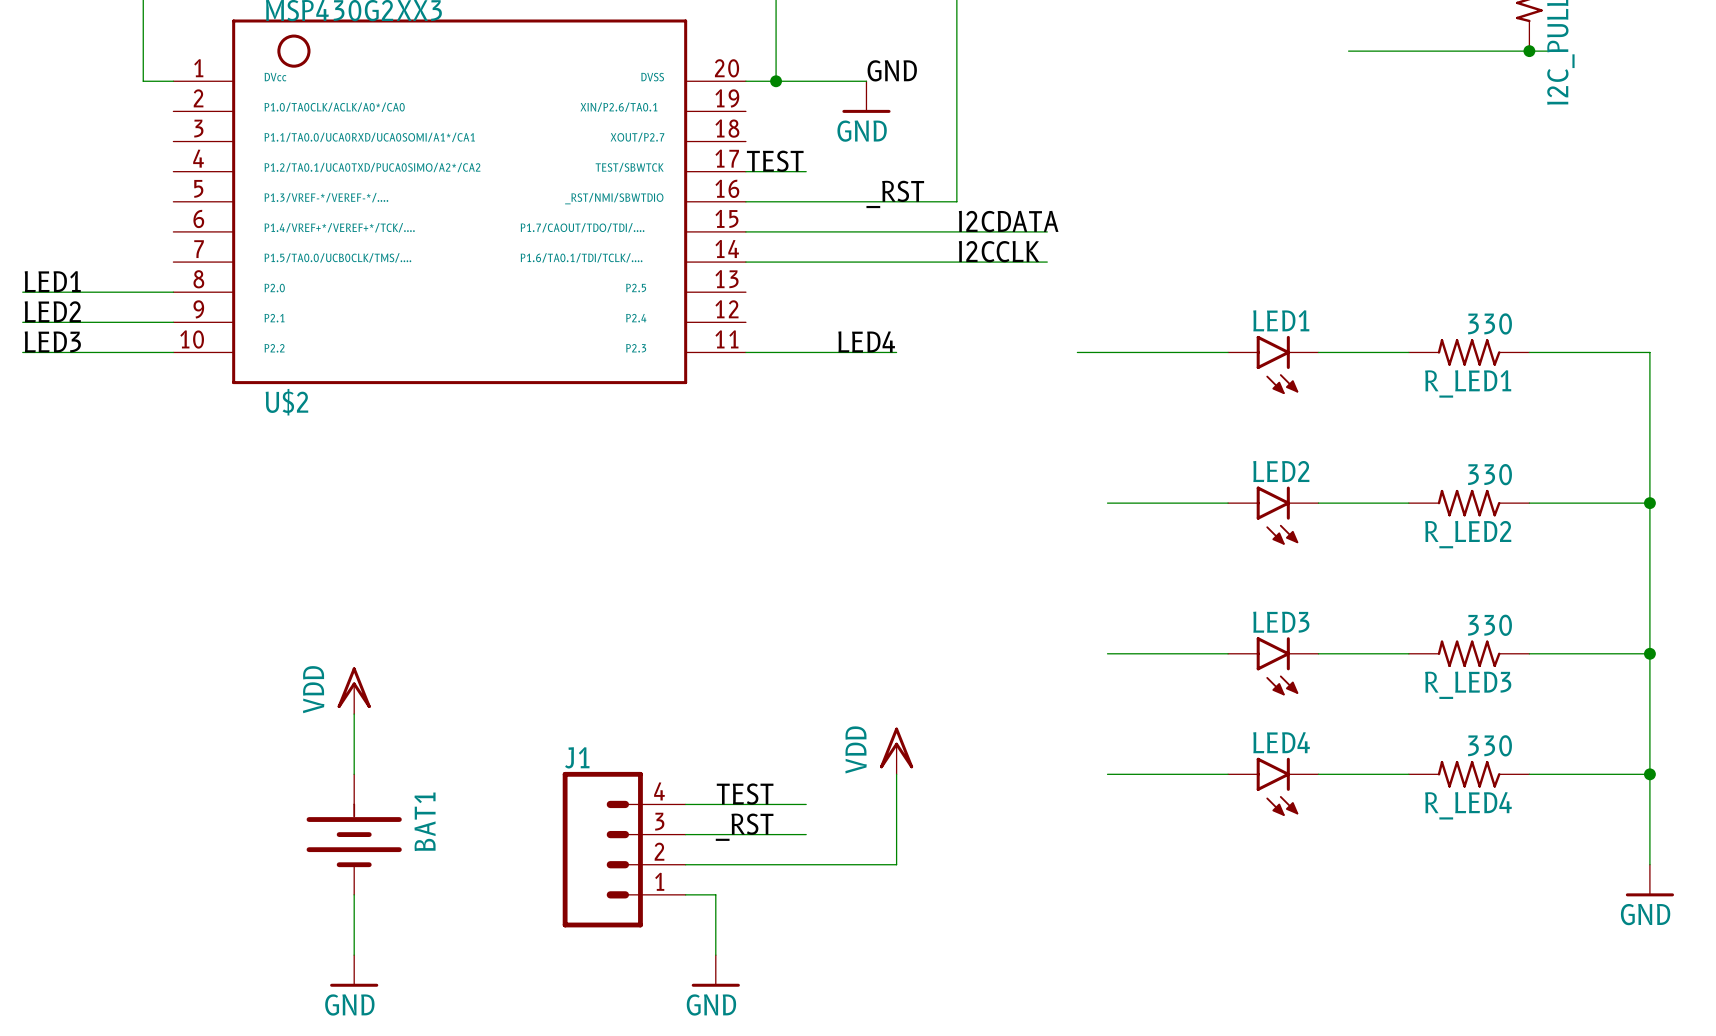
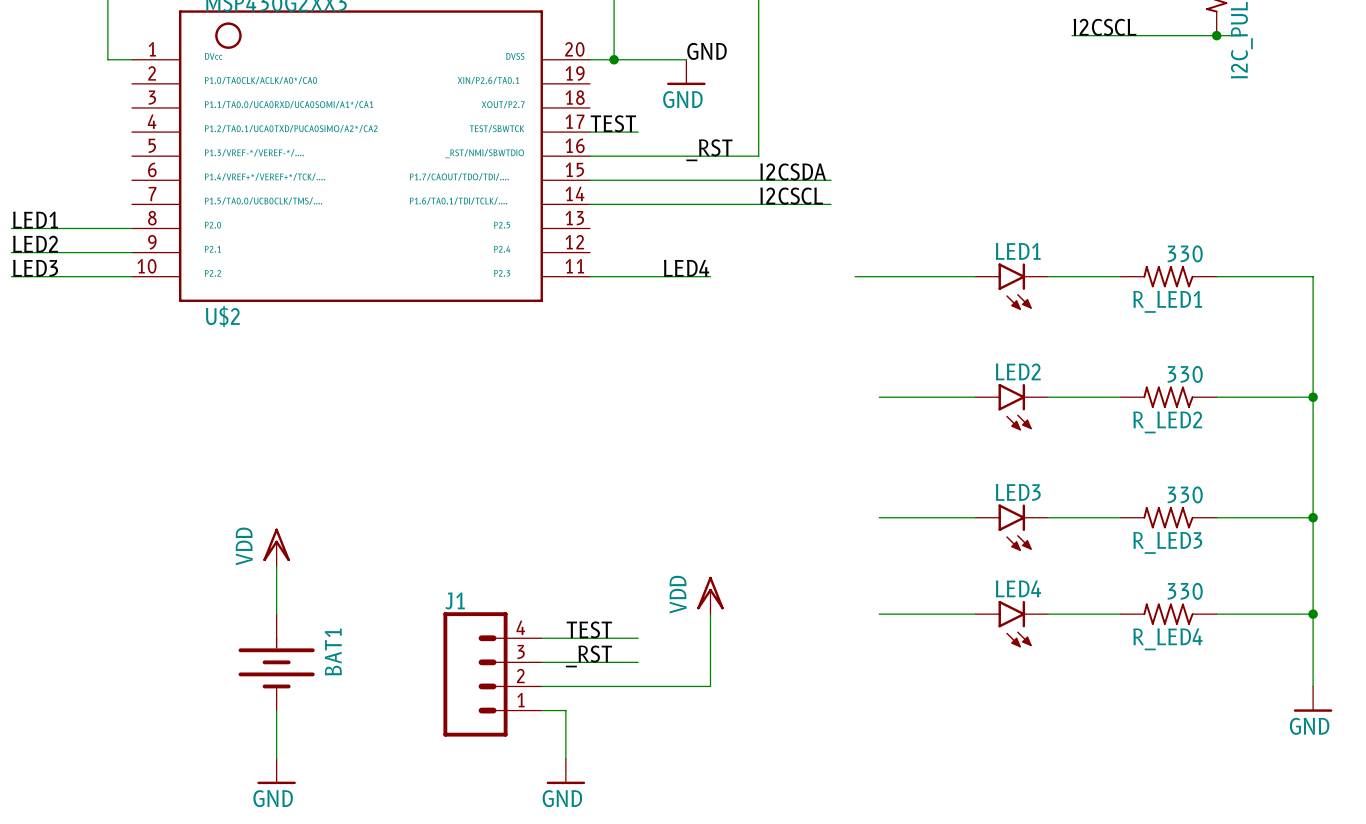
label: none -> I2CSCL (1105, 27)
label: I2CDATA (1008, 221) -> I2CSDA (793, 171)
label: I2CCLK (999, 251) -> I2CSCL (791, 196)

